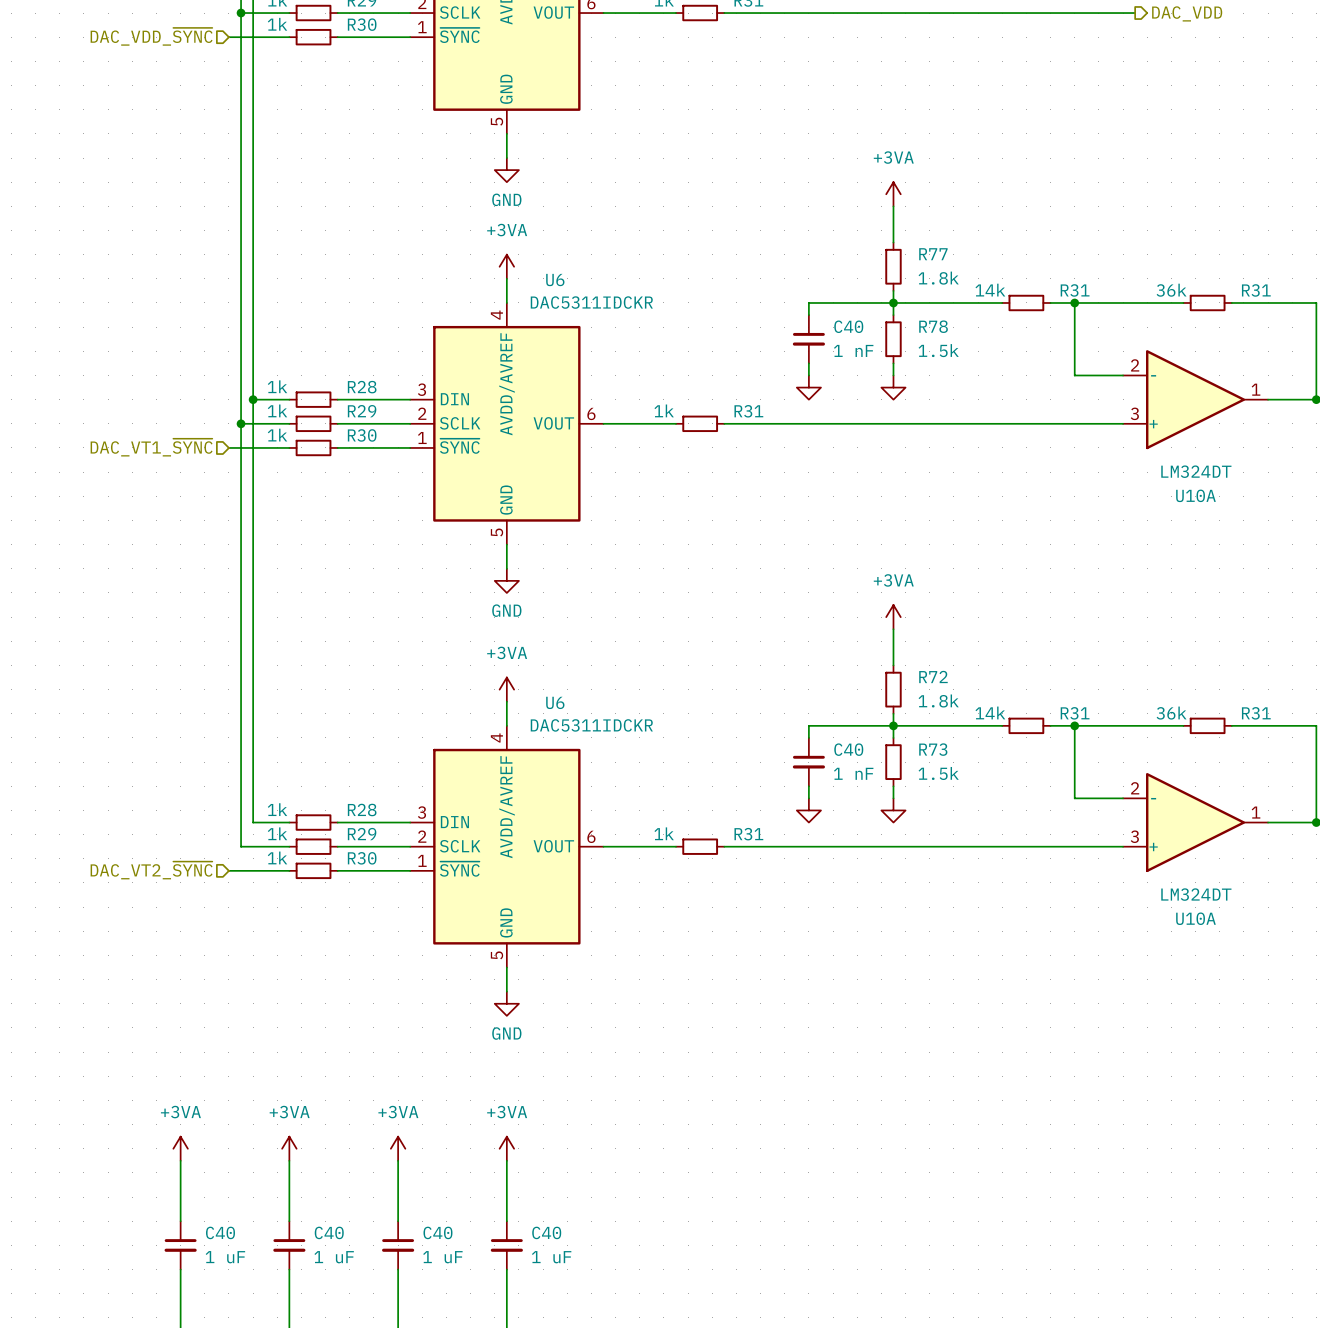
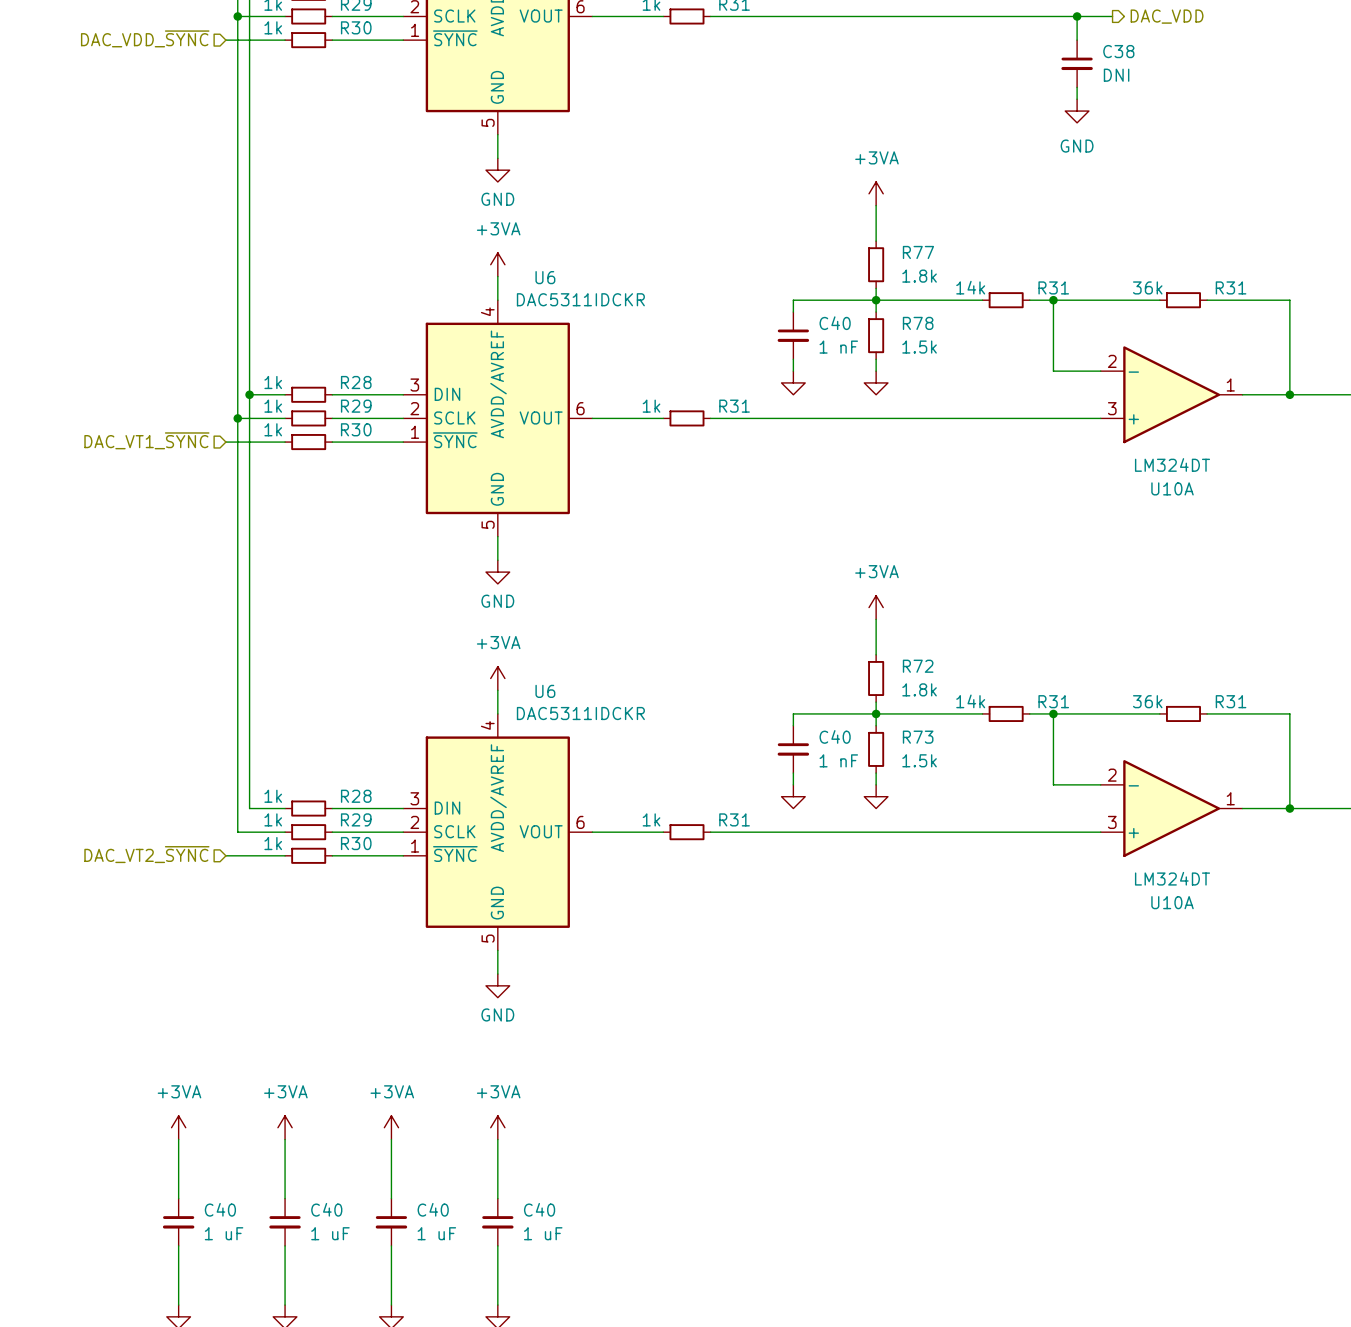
wire: none -> (1077, 16) (1077, 40)
junction: none -> (1077, 16)
C38: none -> DNI (1077, 63)
wire: none -> (1077, 87) (1077, 99)
power symbol: none -> GND (1077, 111)

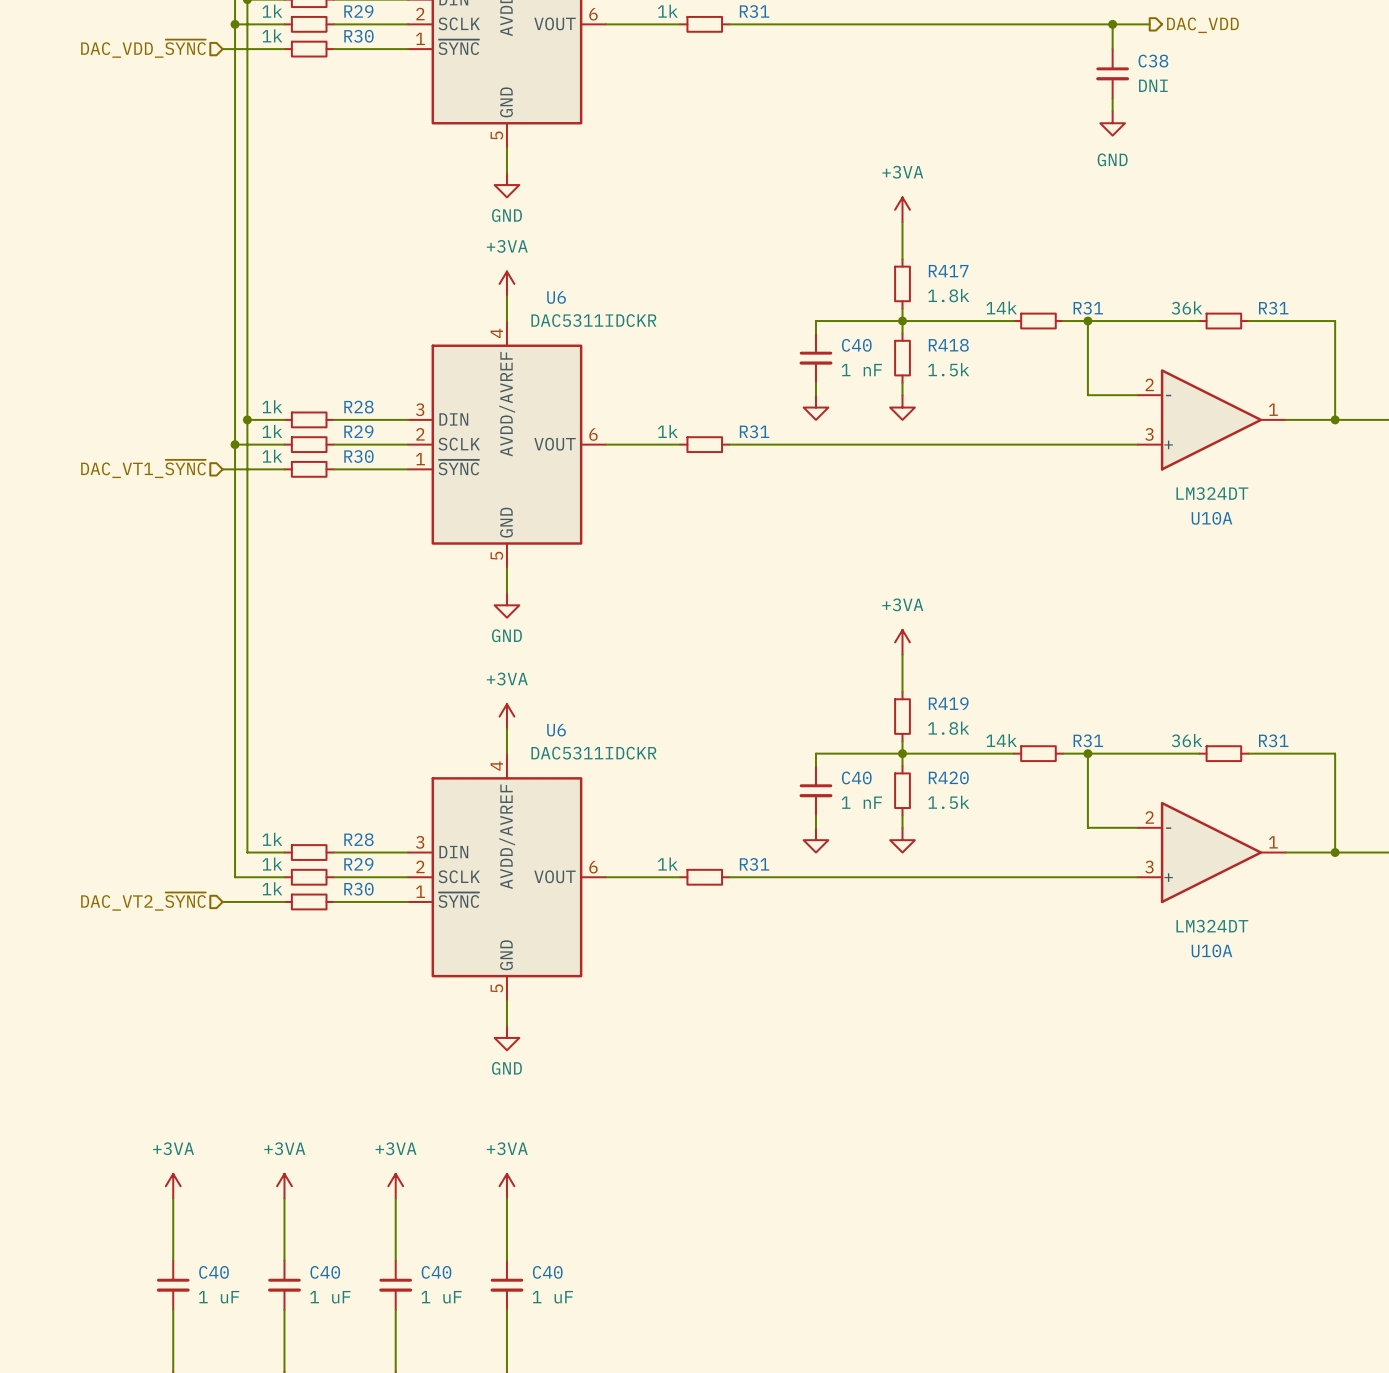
R77 name: R77 (918, 252) -> R417 (948, 271)
R78 name: R78 (918, 323) -> R418 (948, 345)
R72 name: R72 (918, 666) -> R419 (948, 703)
R73 name: R73 (918, 737) -> R420 (948, 777)

